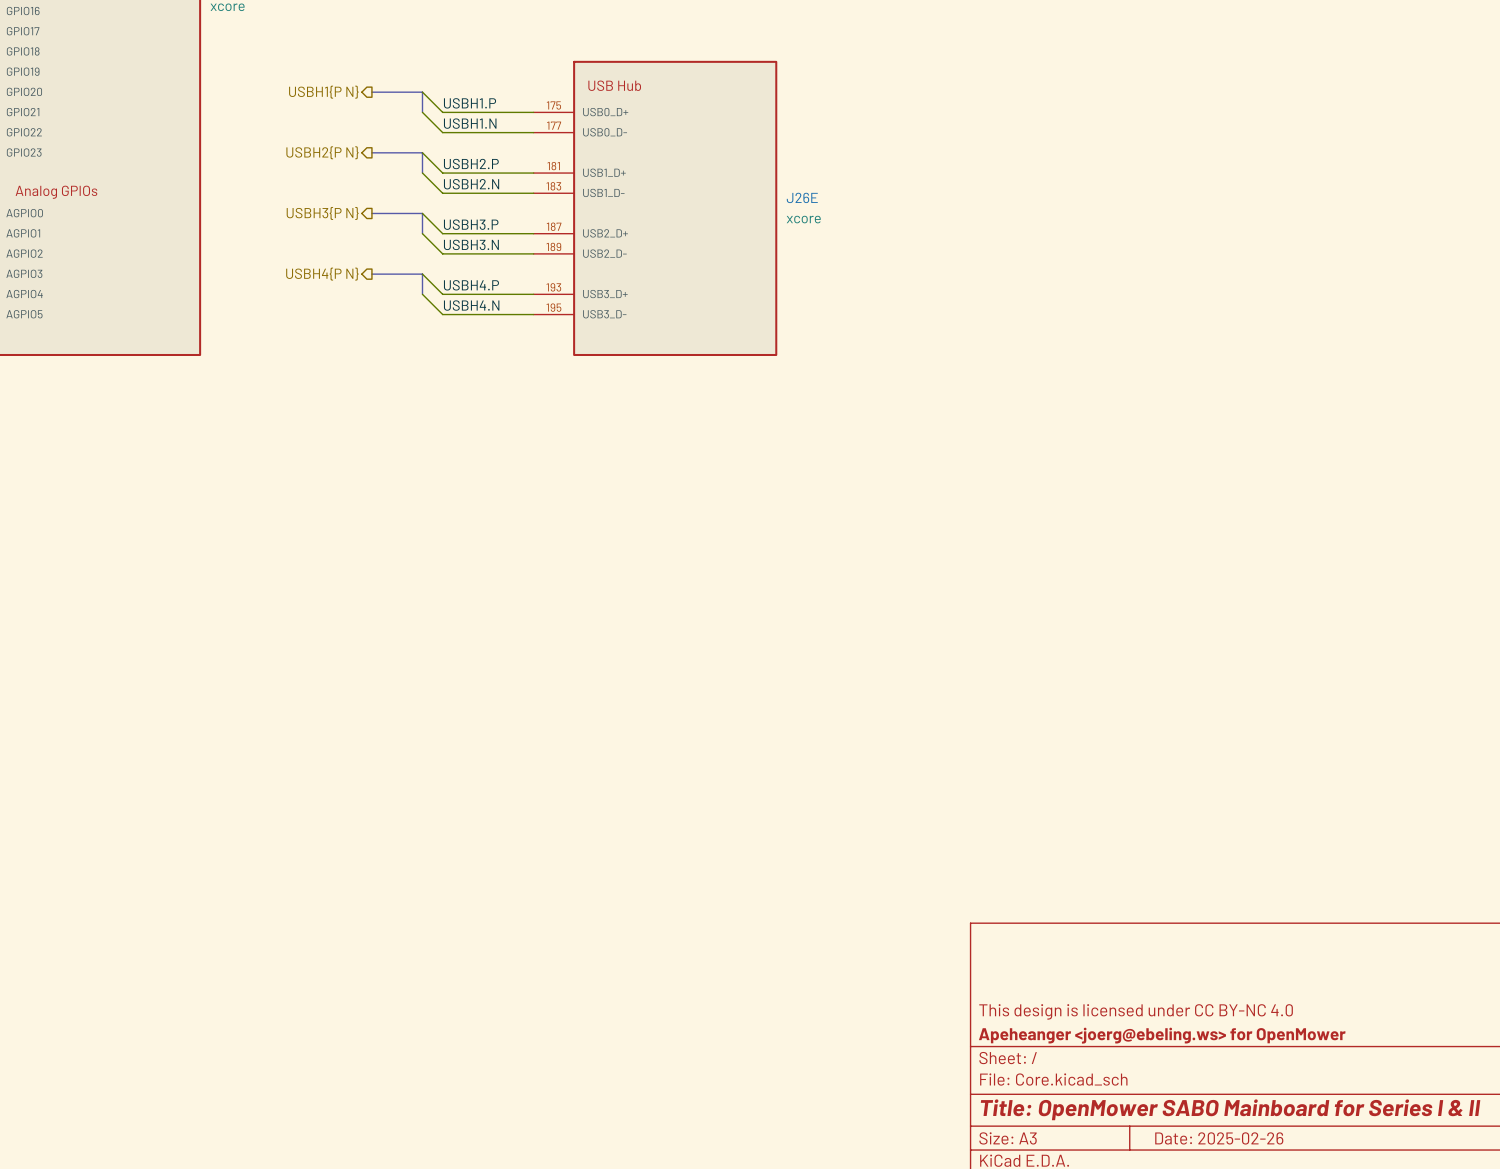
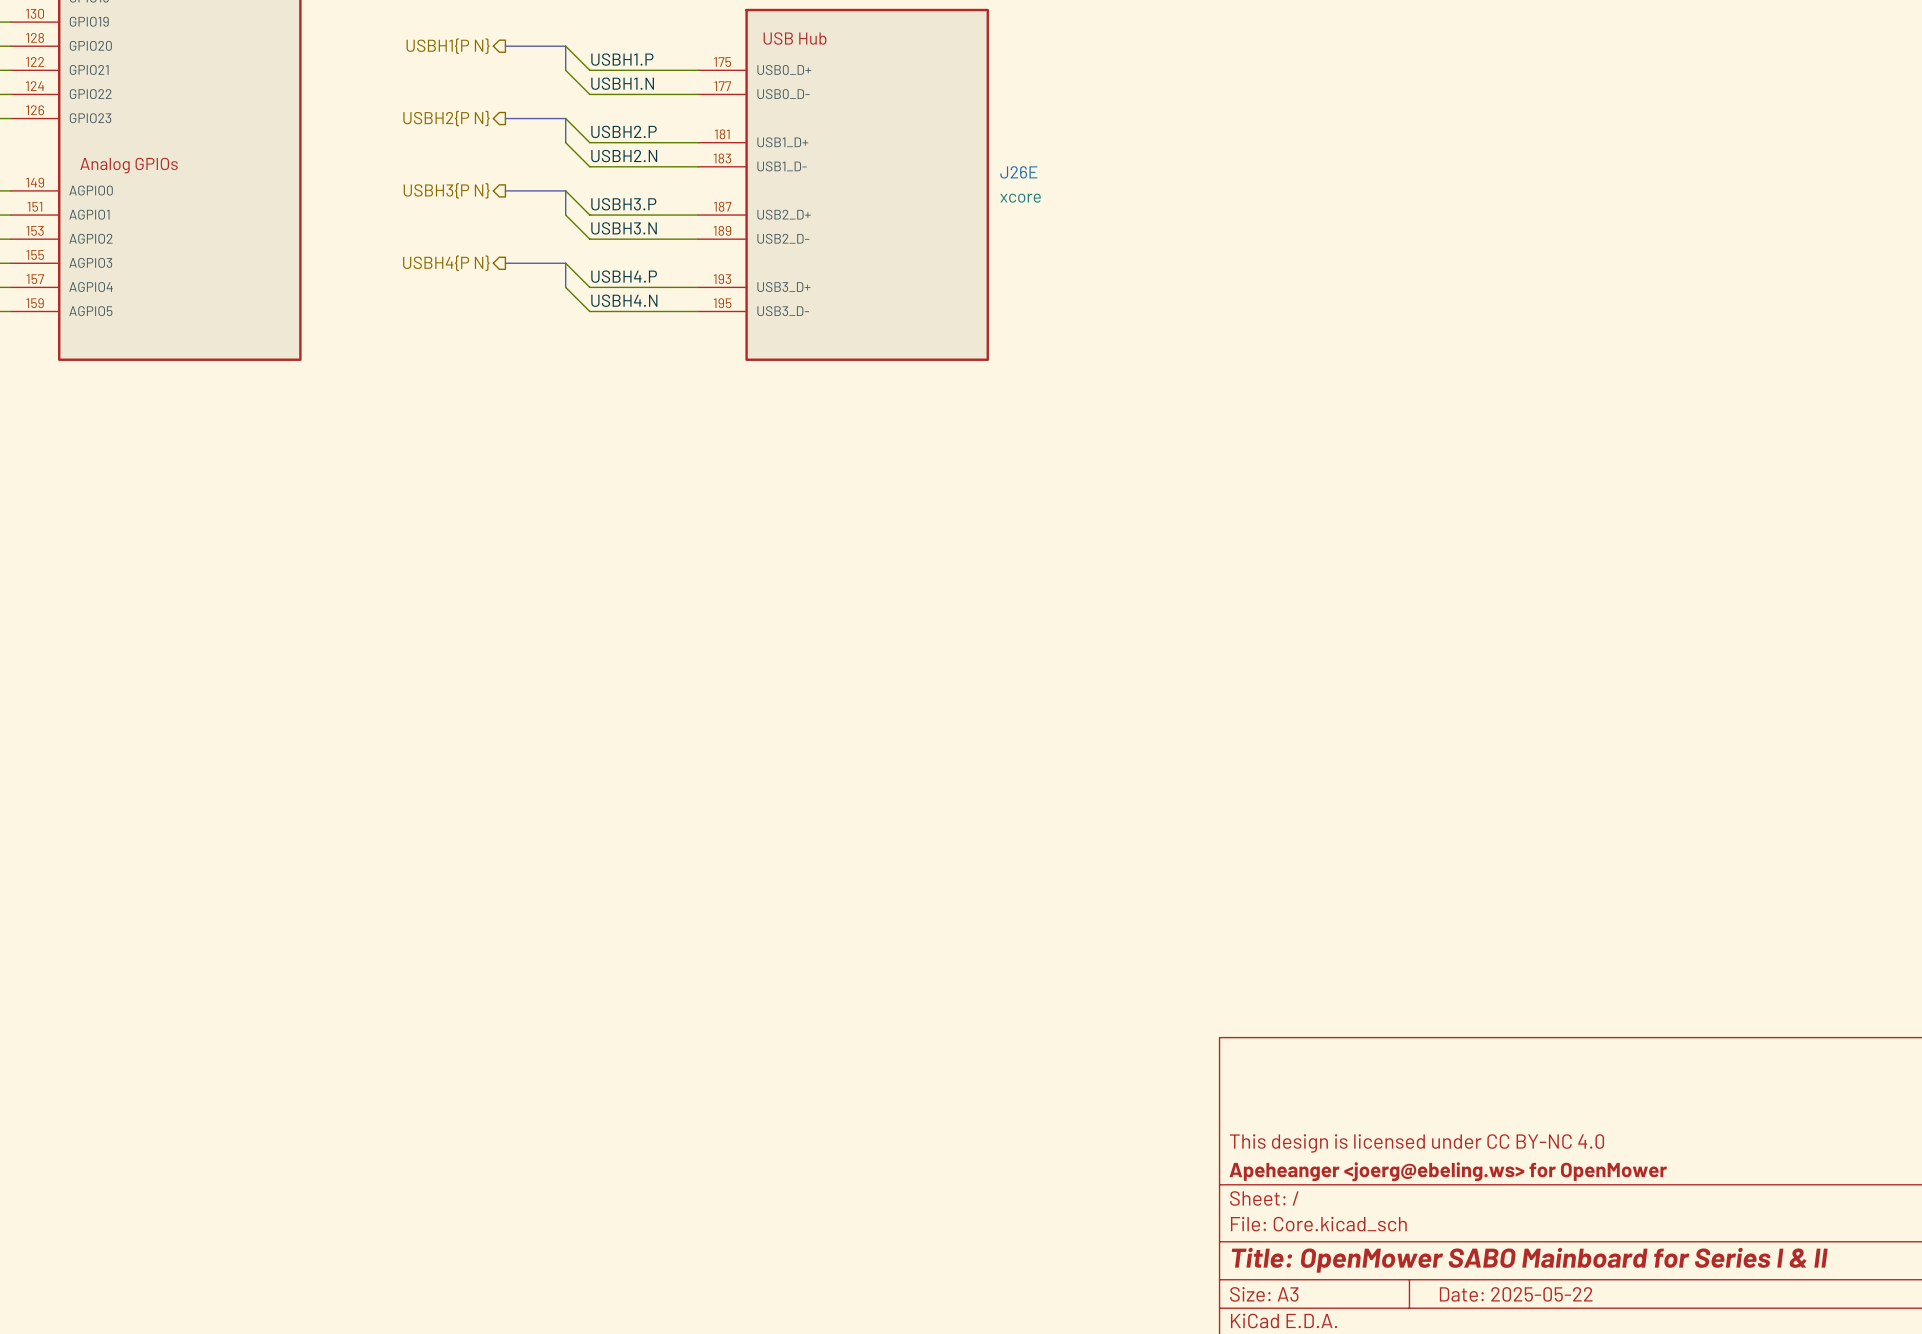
title block: Date: 2025-02-26 (1219, 1138) -> Date: 2025-05-22 (1516, 1294)

